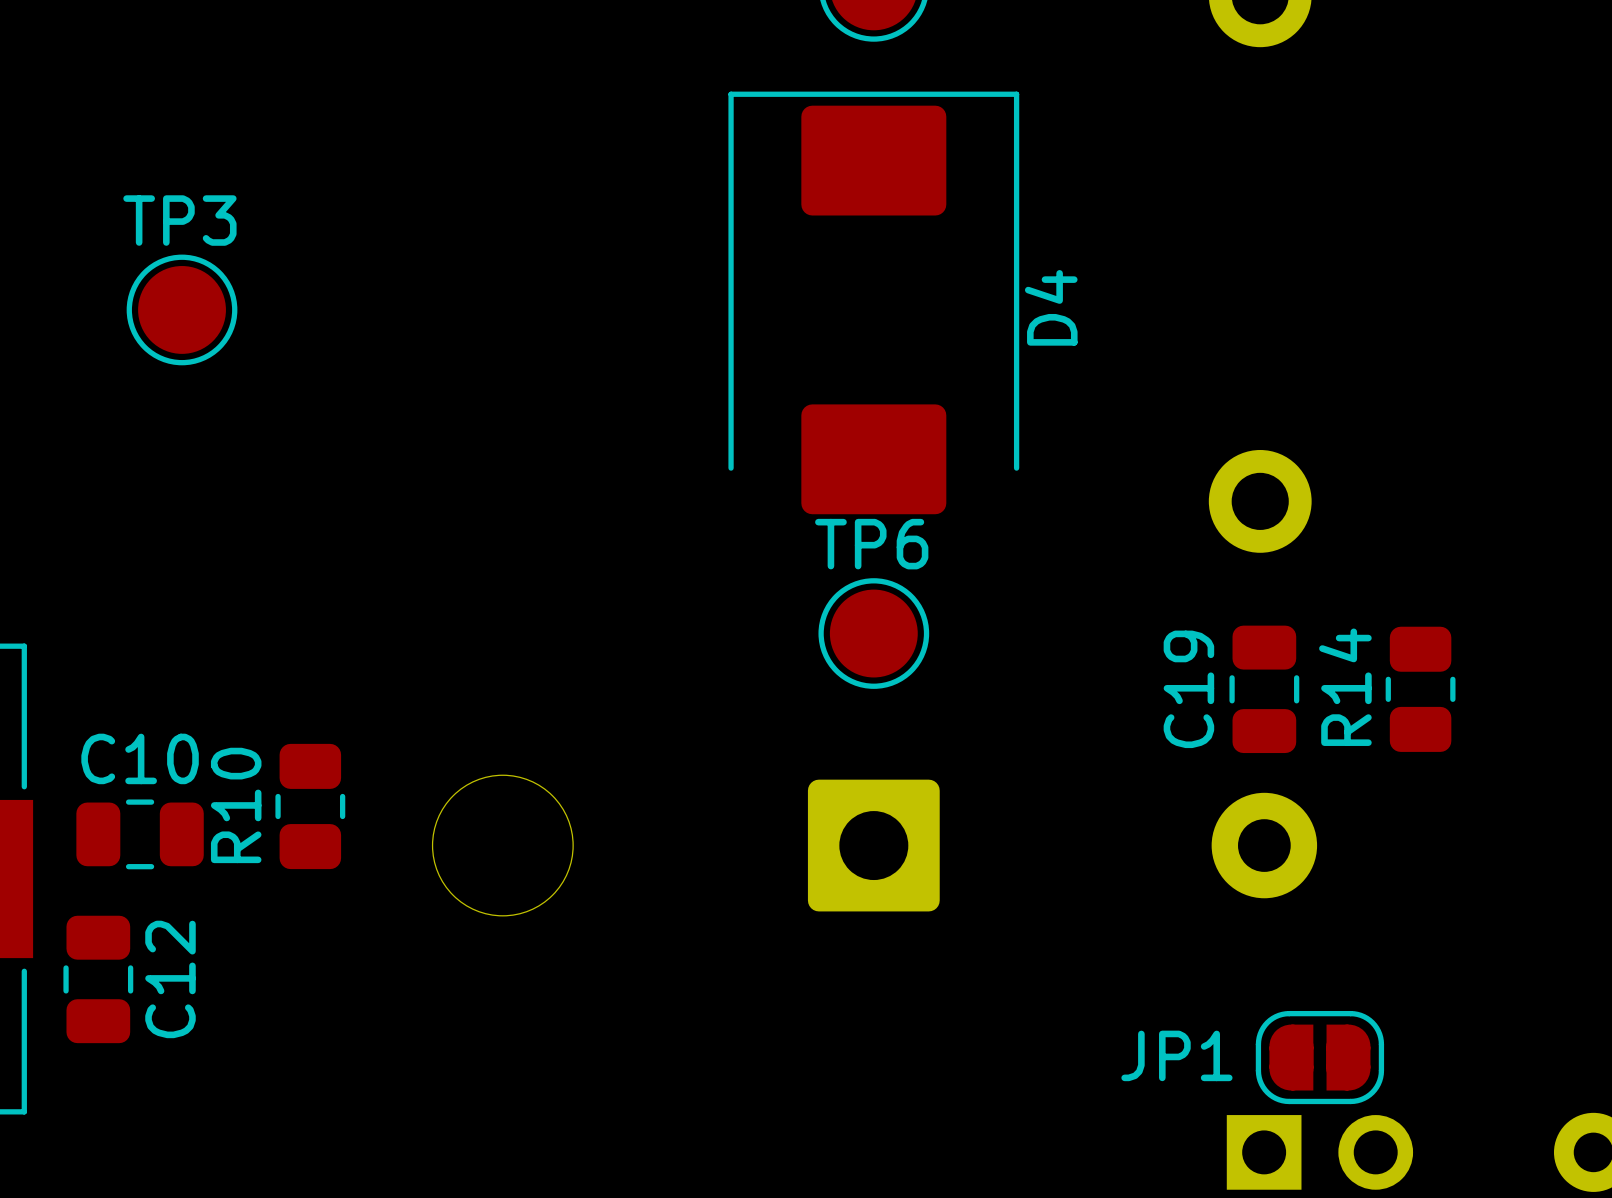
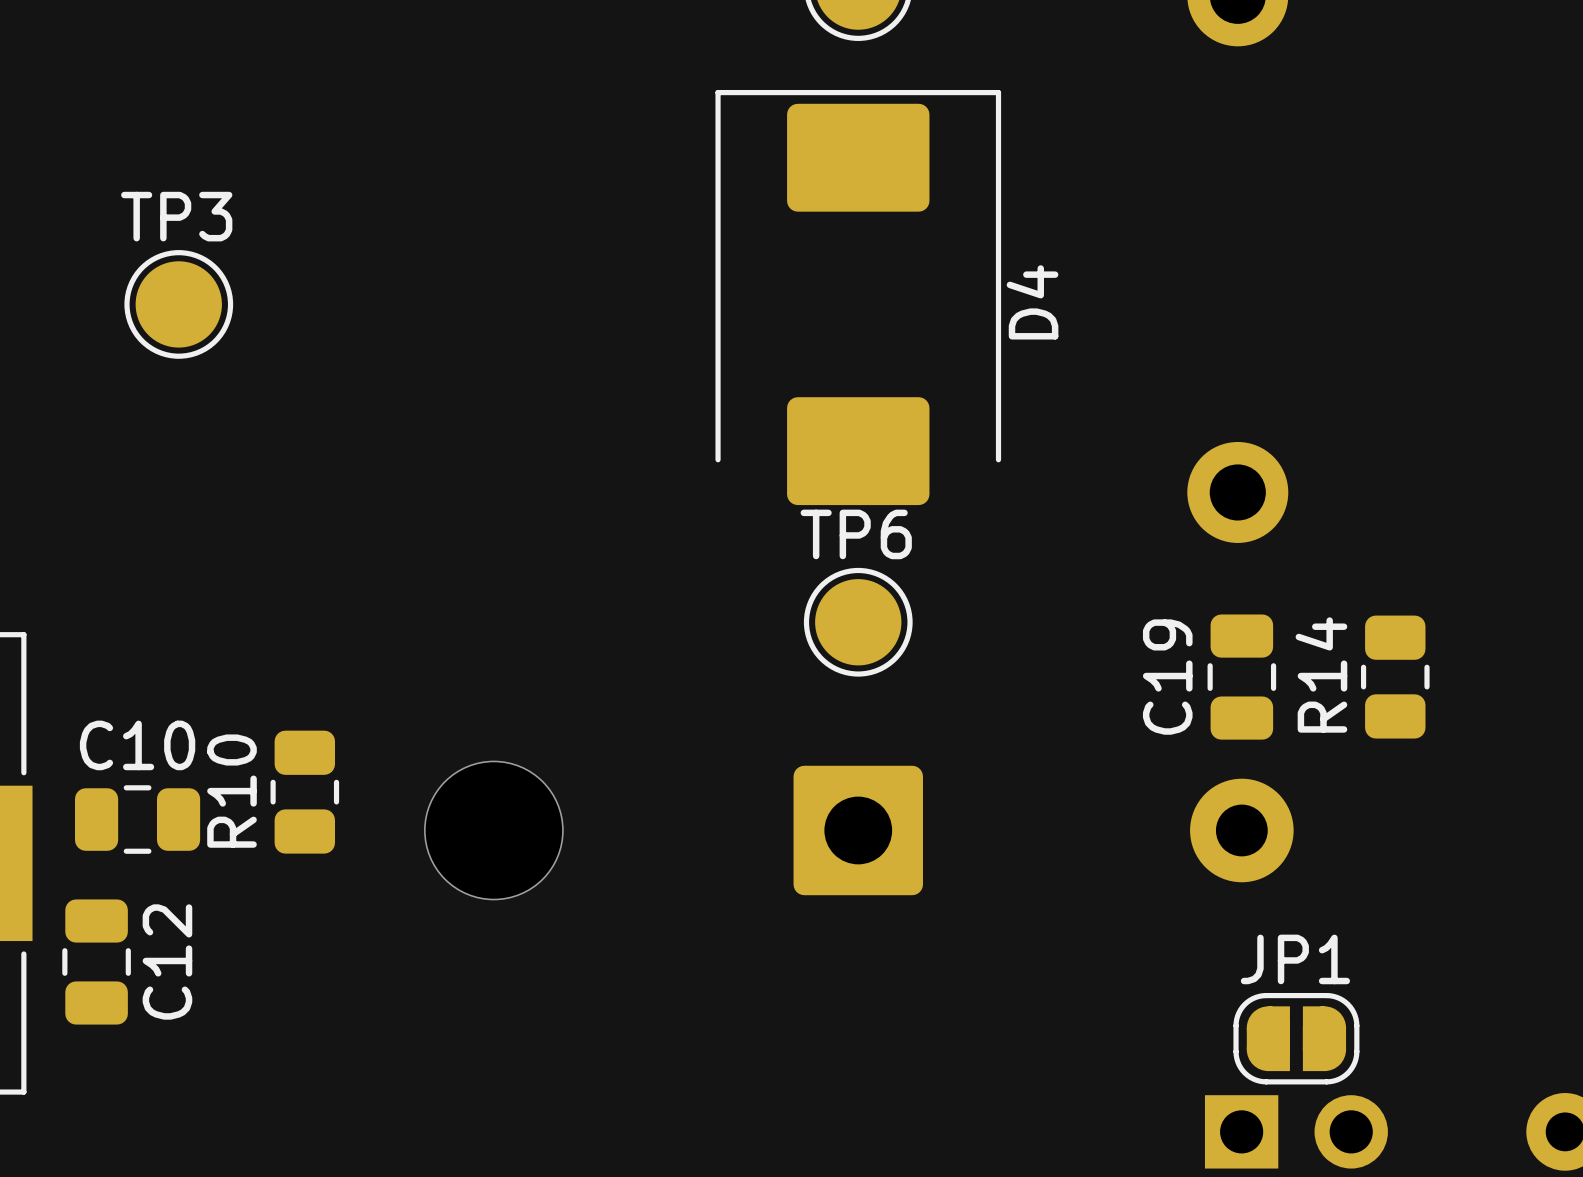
JP1 name position: JP1 (1176, 1055) -> JP1 (1295, 959)

